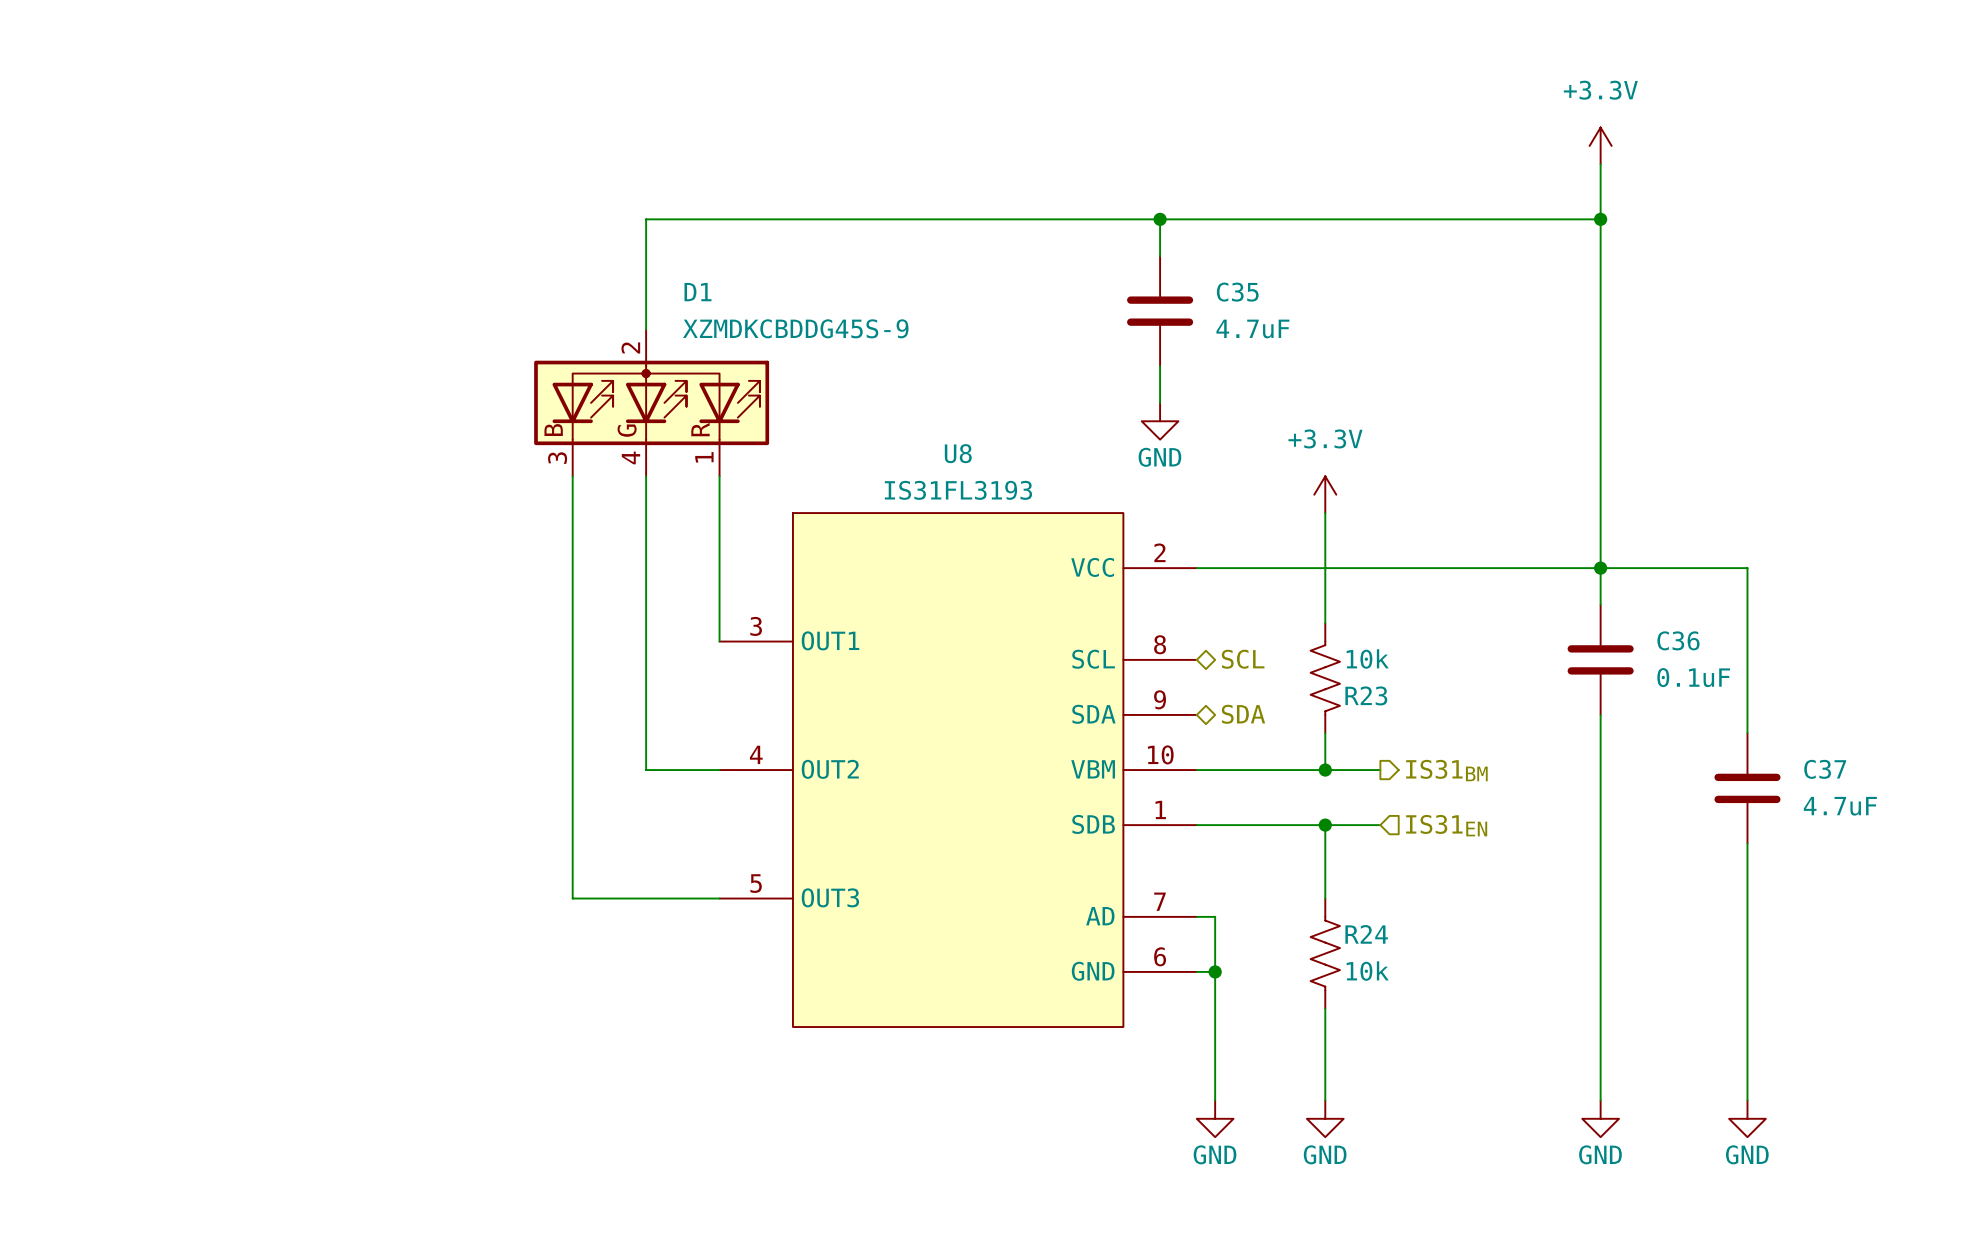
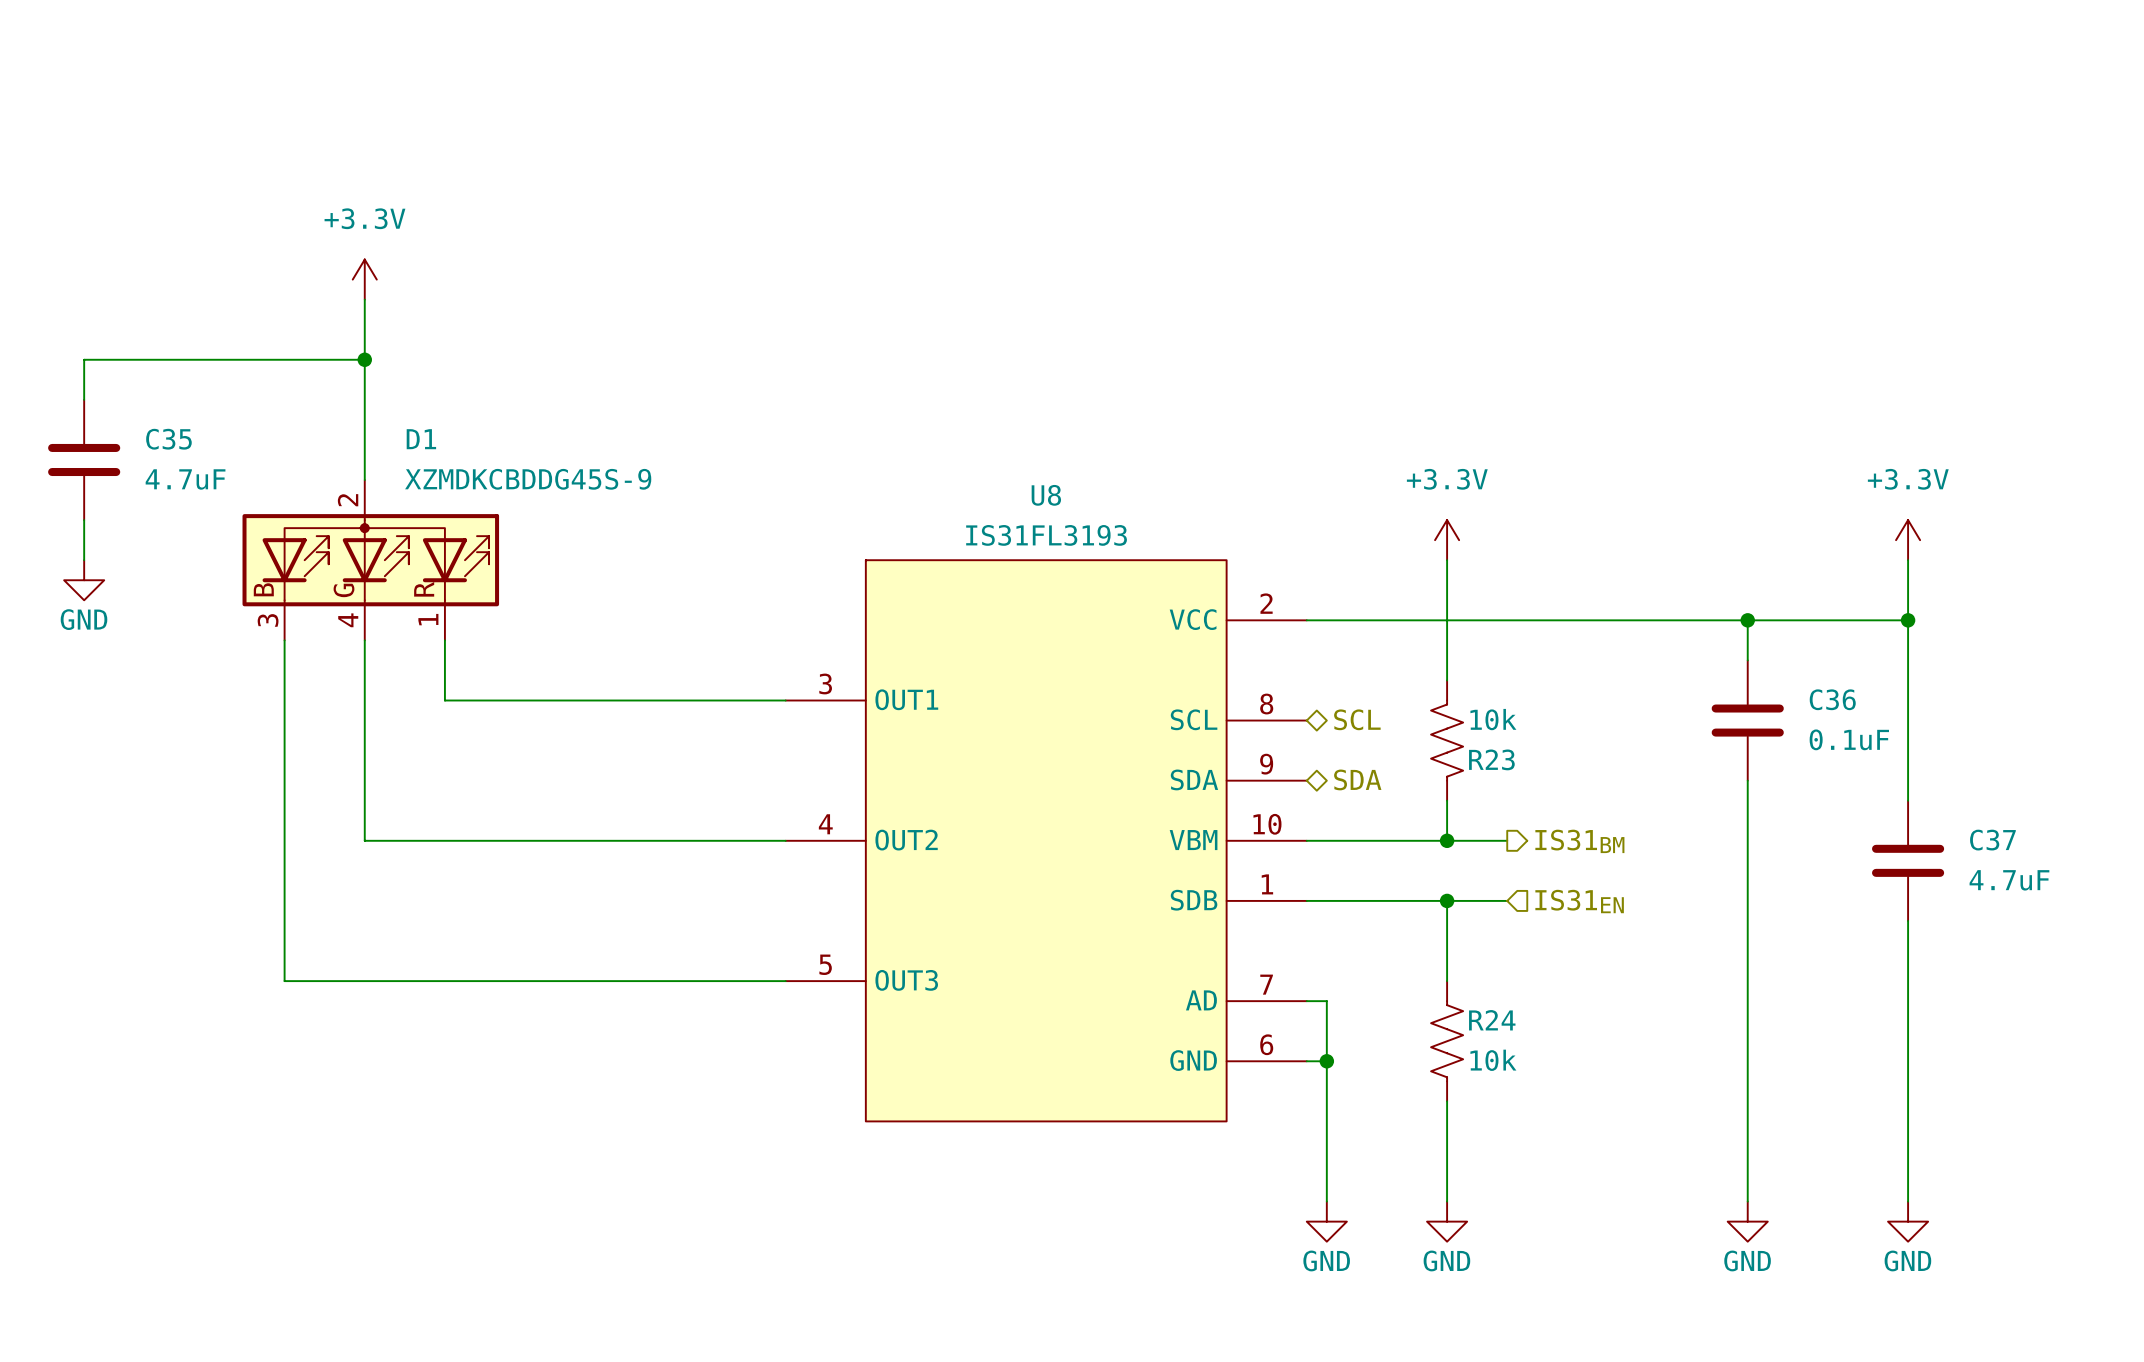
power symbol: +3.3V (1600, 145) -> none
wire: (1600, 164) (1600, 568) -> none
wire: (1160, 219) (1160, 256) -> none
junction: (1160, 219) -> none
wire: (1600, 219) (646, 219) (646, 329) -> none
junction: (1600, 219) -> none
power symbol: none -> +3.3V (364, 279)
wire: none -> (364, 299) (364, 480)
C35 position: (1160, 311) -> (84, 459)
wire: none -> (364, 359) (84, 359) (84, 399)
junction: none -> (364, 359)
wire: (1160, 366) (1160, 402) -> none
D1 position: (651, 402) -> (370, 560)
power symbol: GND (1160, 421) -> none
wire: none -> (84, 520) (84, 560)
wire: (572, 476) (572, 898) -> (284, 640) (284, 981) (625, 981)
wire: (646, 476) (646, 770) -> (364, 640) (364, 840) (705, 840)
wire: (719, 476) (719, 641) -> (444, 640) (444, 700) (785, 700)
power symbol: none -> +3.3V (1908, 540)
wire: none -> (1908, 560) (1908, 620)
power symbol: none -> GND (84, 580)
junction: none -> (1908, 620)

